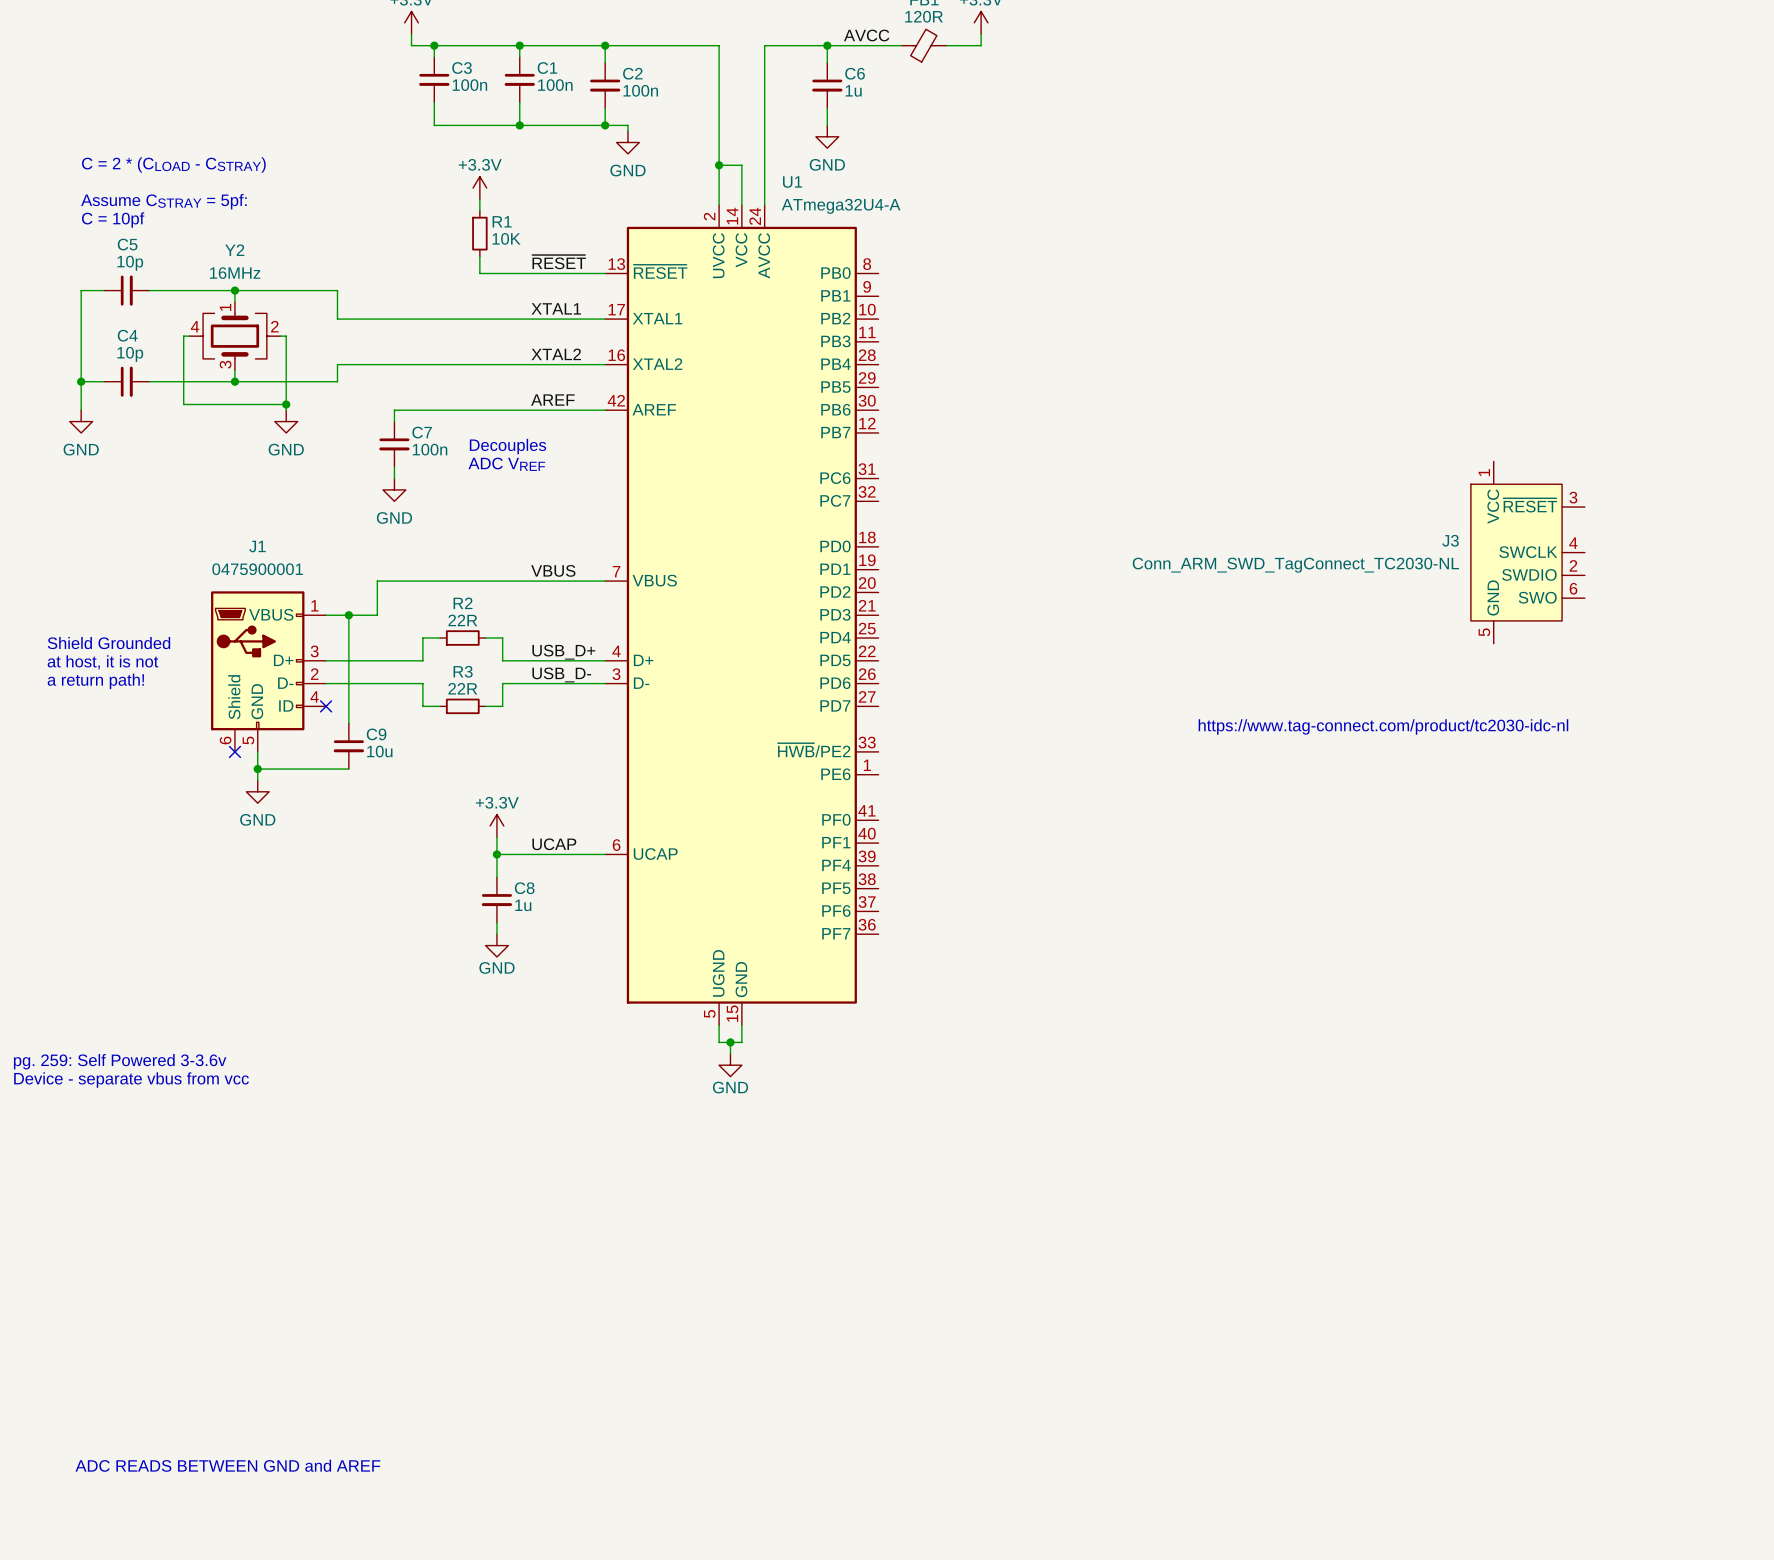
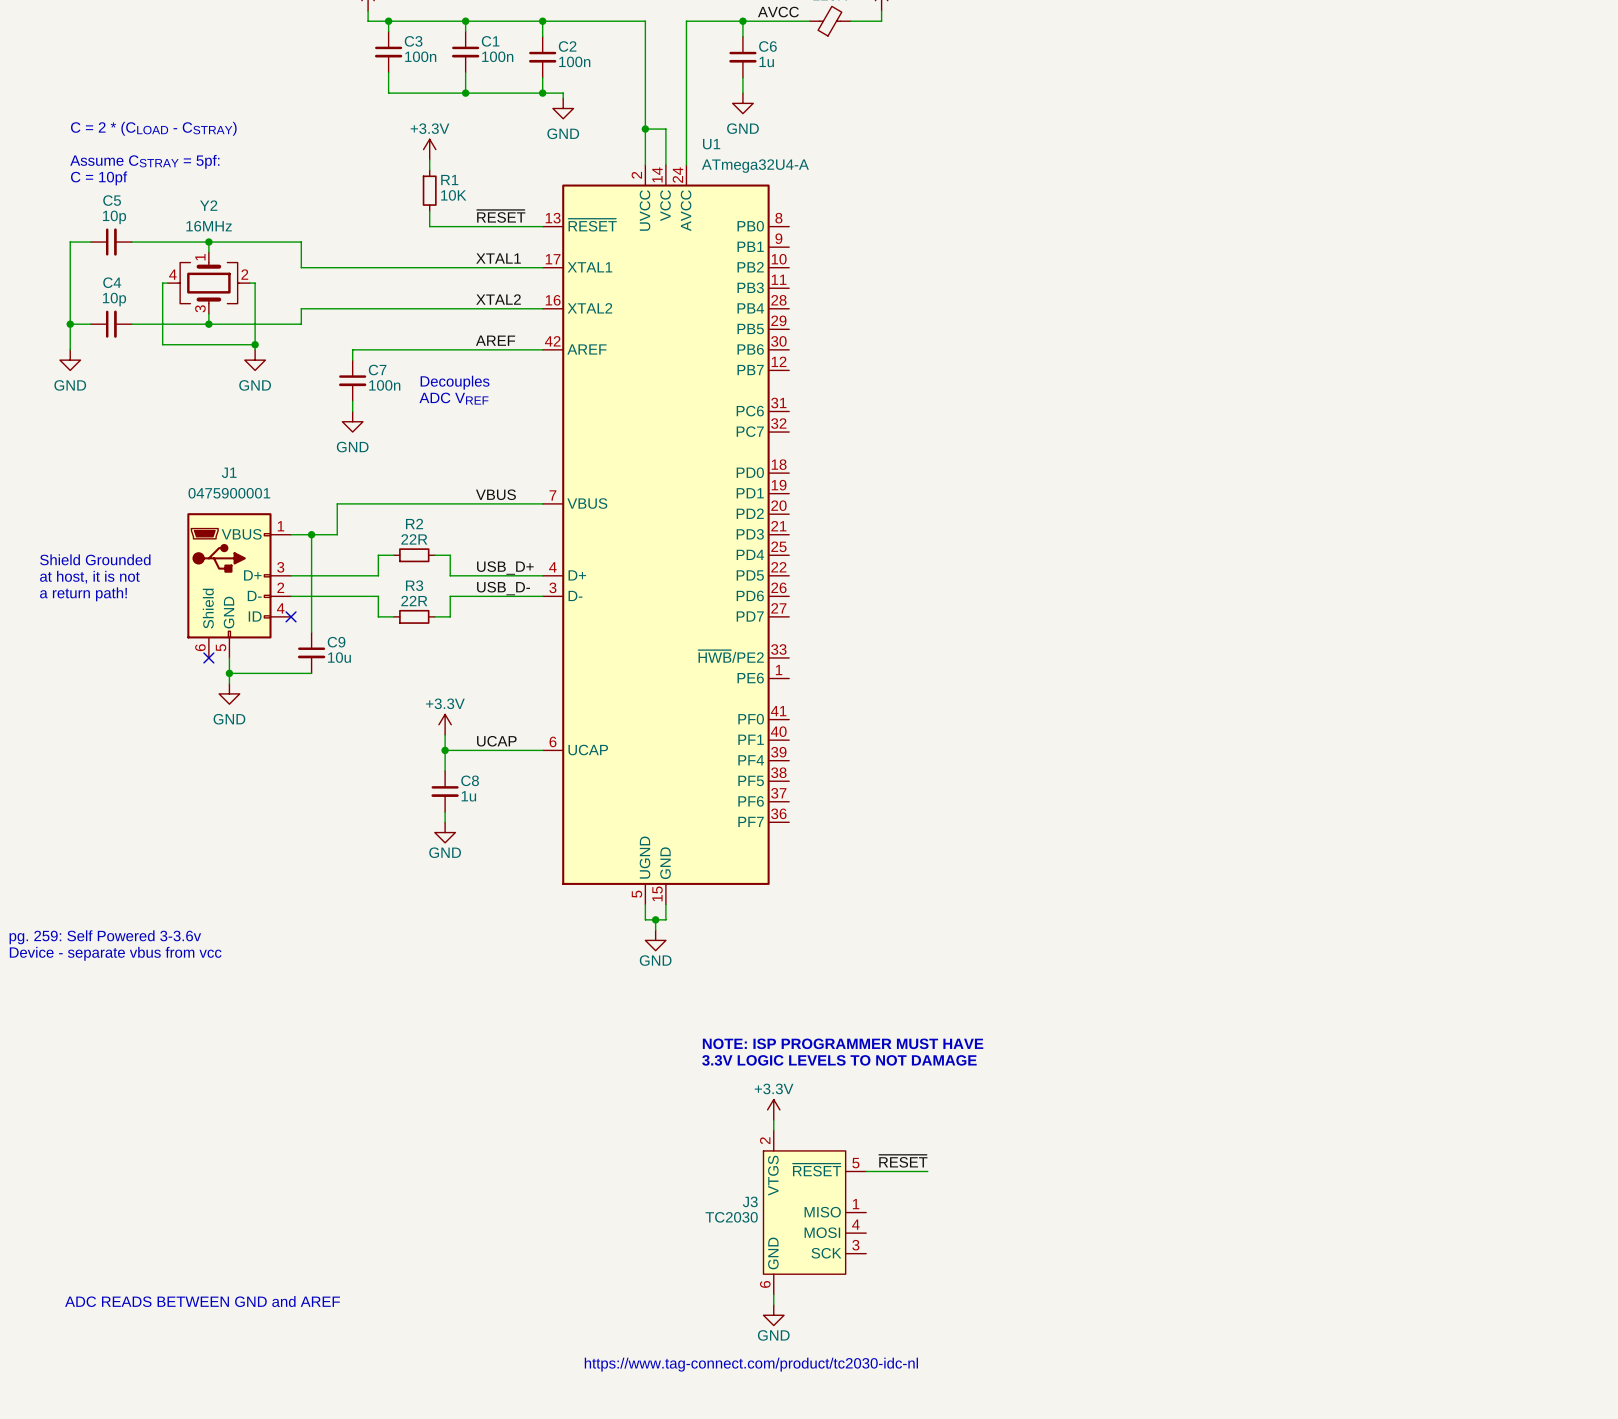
J3 symbol: [1470, 461, 1585, 644] -> [763, 1130, 867, 1295]
J3 value: Conn_ARM_SWD_TagConnect_TC2030-NL (1295, 565) -> TC2030 (731, 1217)
text: https://www.tag-connect.com/product/tc2030-idc-nl (1383, 726) -> none
text: none -> NOTE: ISP PROGRAMMER MUST HAVE (843, 1043)
text: none -> 3.3V LOGIC LEVELS TO NOT DAMAGE (839, 1060)
power symbol: none -> +3.3V (773, 1109)
wire: none -> (773, 1120) (773, 1130)
label: none -> ~{RESET} (903, 1161)
wire: none -> (866, 1171) (927, 1171)
wire: none -> (773, 1294) (773, 1305)
power symbol: none -> GND (773, 1315)
text: none -> https://www.tag-connect.com/product/tc2030-idc-nl (751, 1364)

